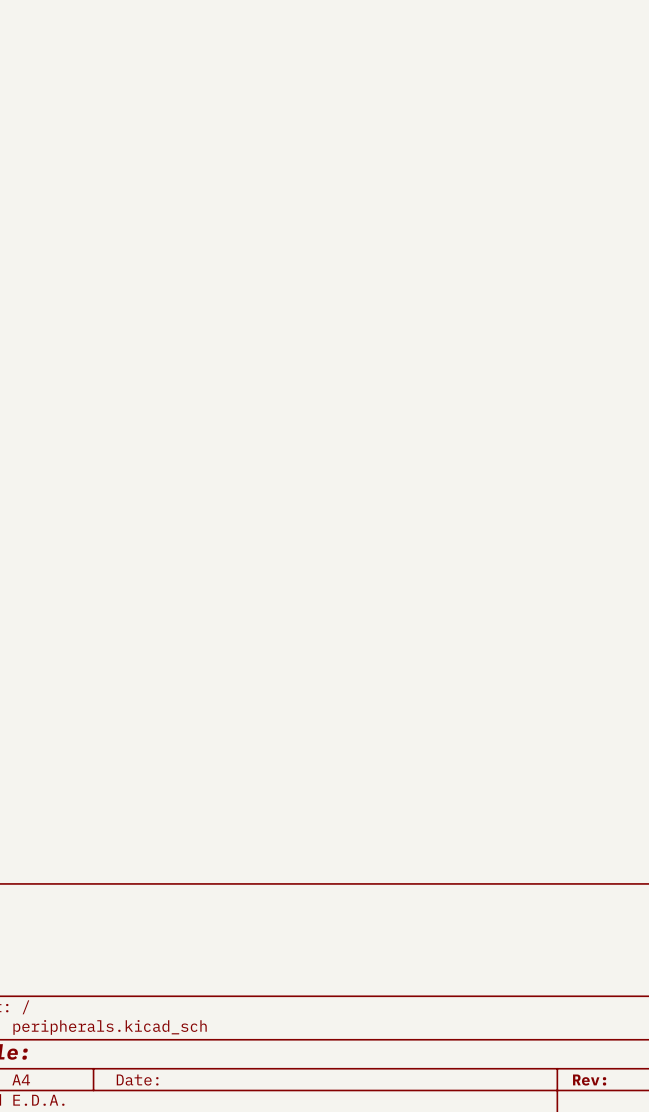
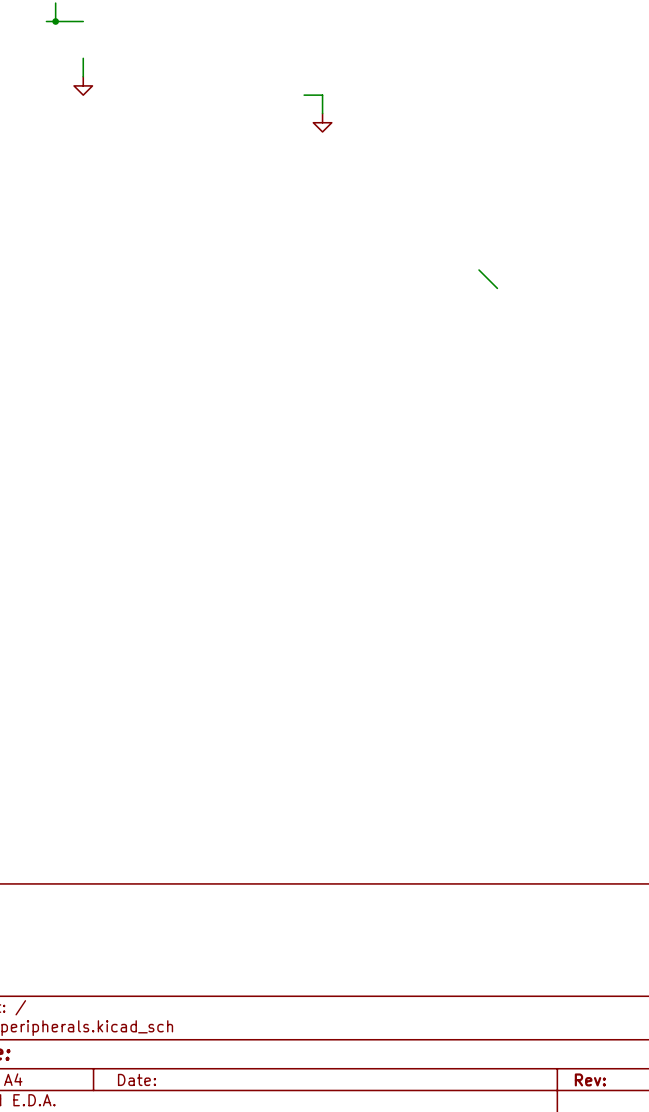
wire: none -> (55, 3) (55, 21)
wire: none -> (46, 21) (83, 21)
junction: none -> (55, 21)
wire: none -> (83, 58) (83, 76)
power symbol: none -> (83, 85)
wire: none -> (304, 95) (322, 95) (322, 113)
power symbol: none -> (322, 122)
wire: none -> (479, 270) (497, 288)

